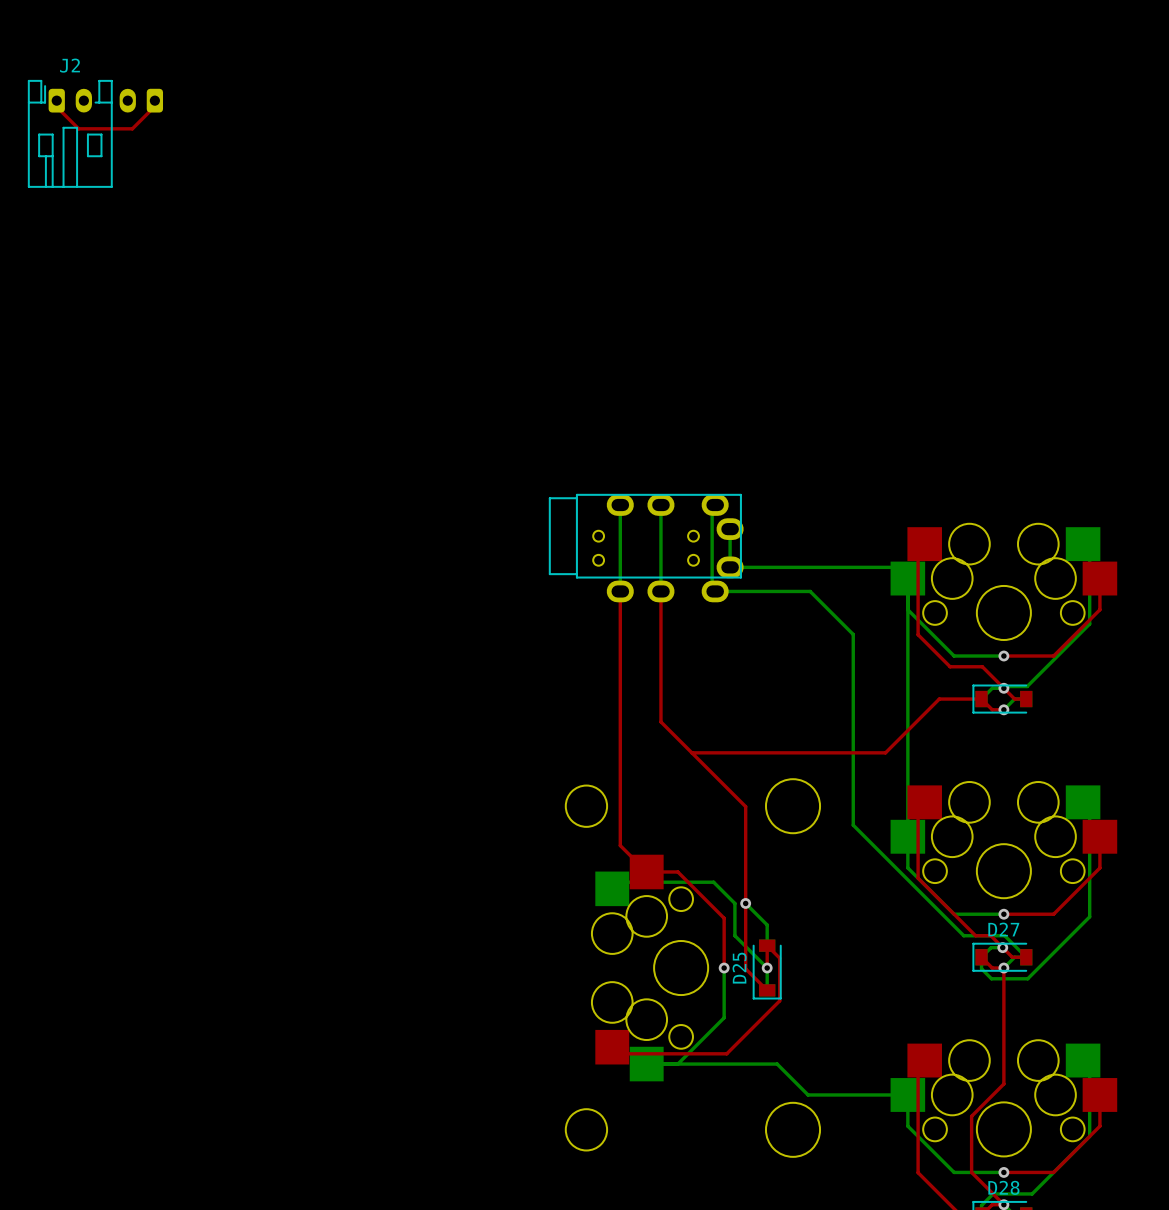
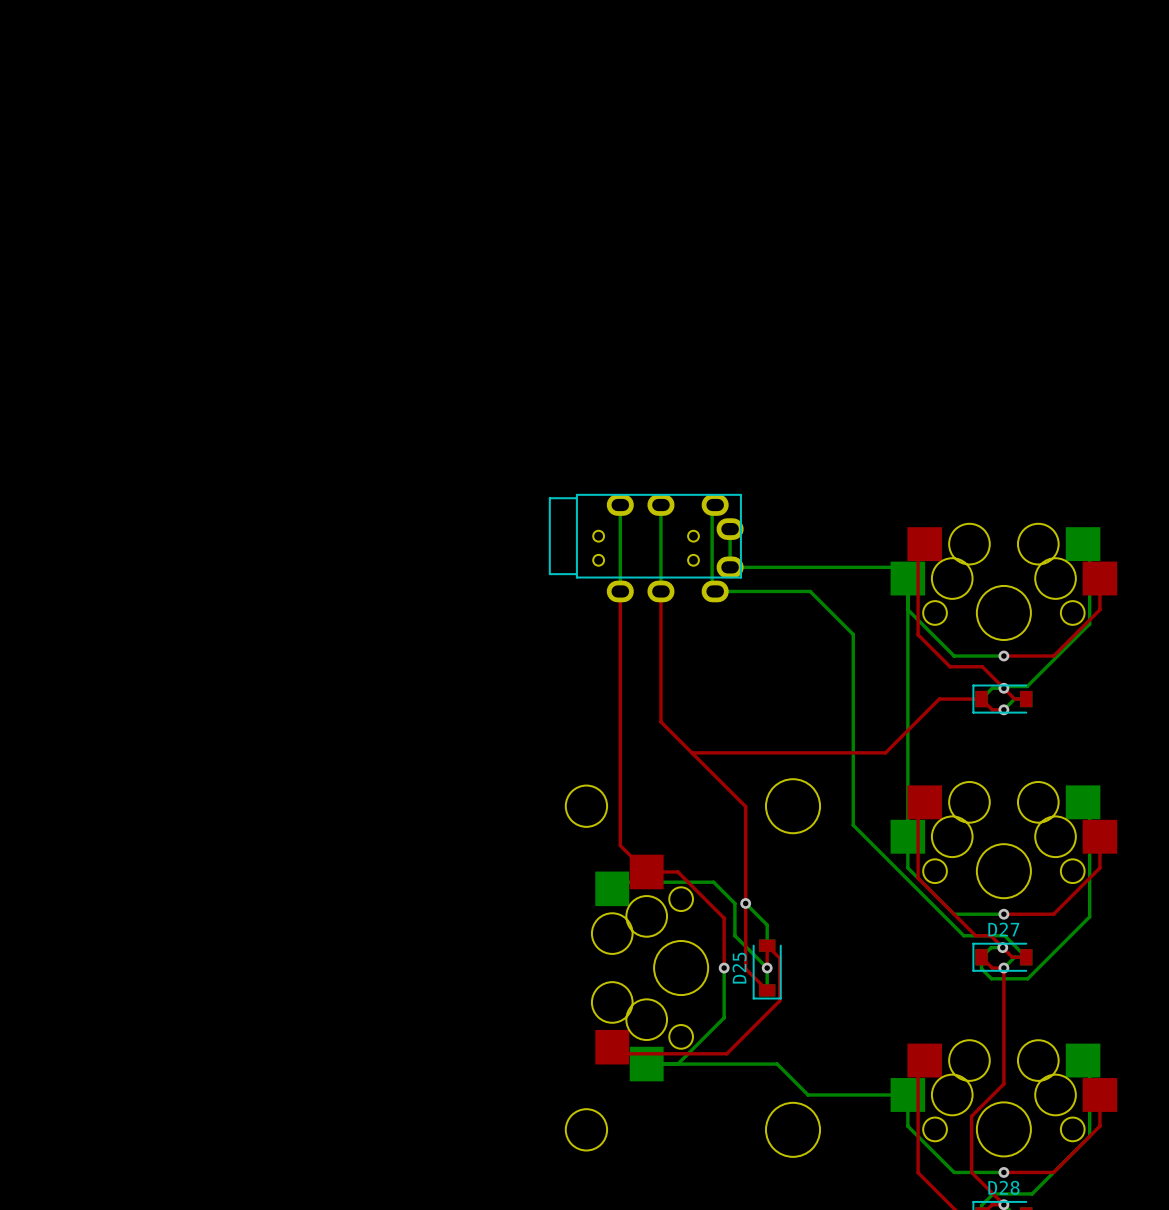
top track: (56, 100) (56, 106) (78, 128) (132, 128) (154, 106) (154, 100) -> none
J2: (95, 133) -> none

